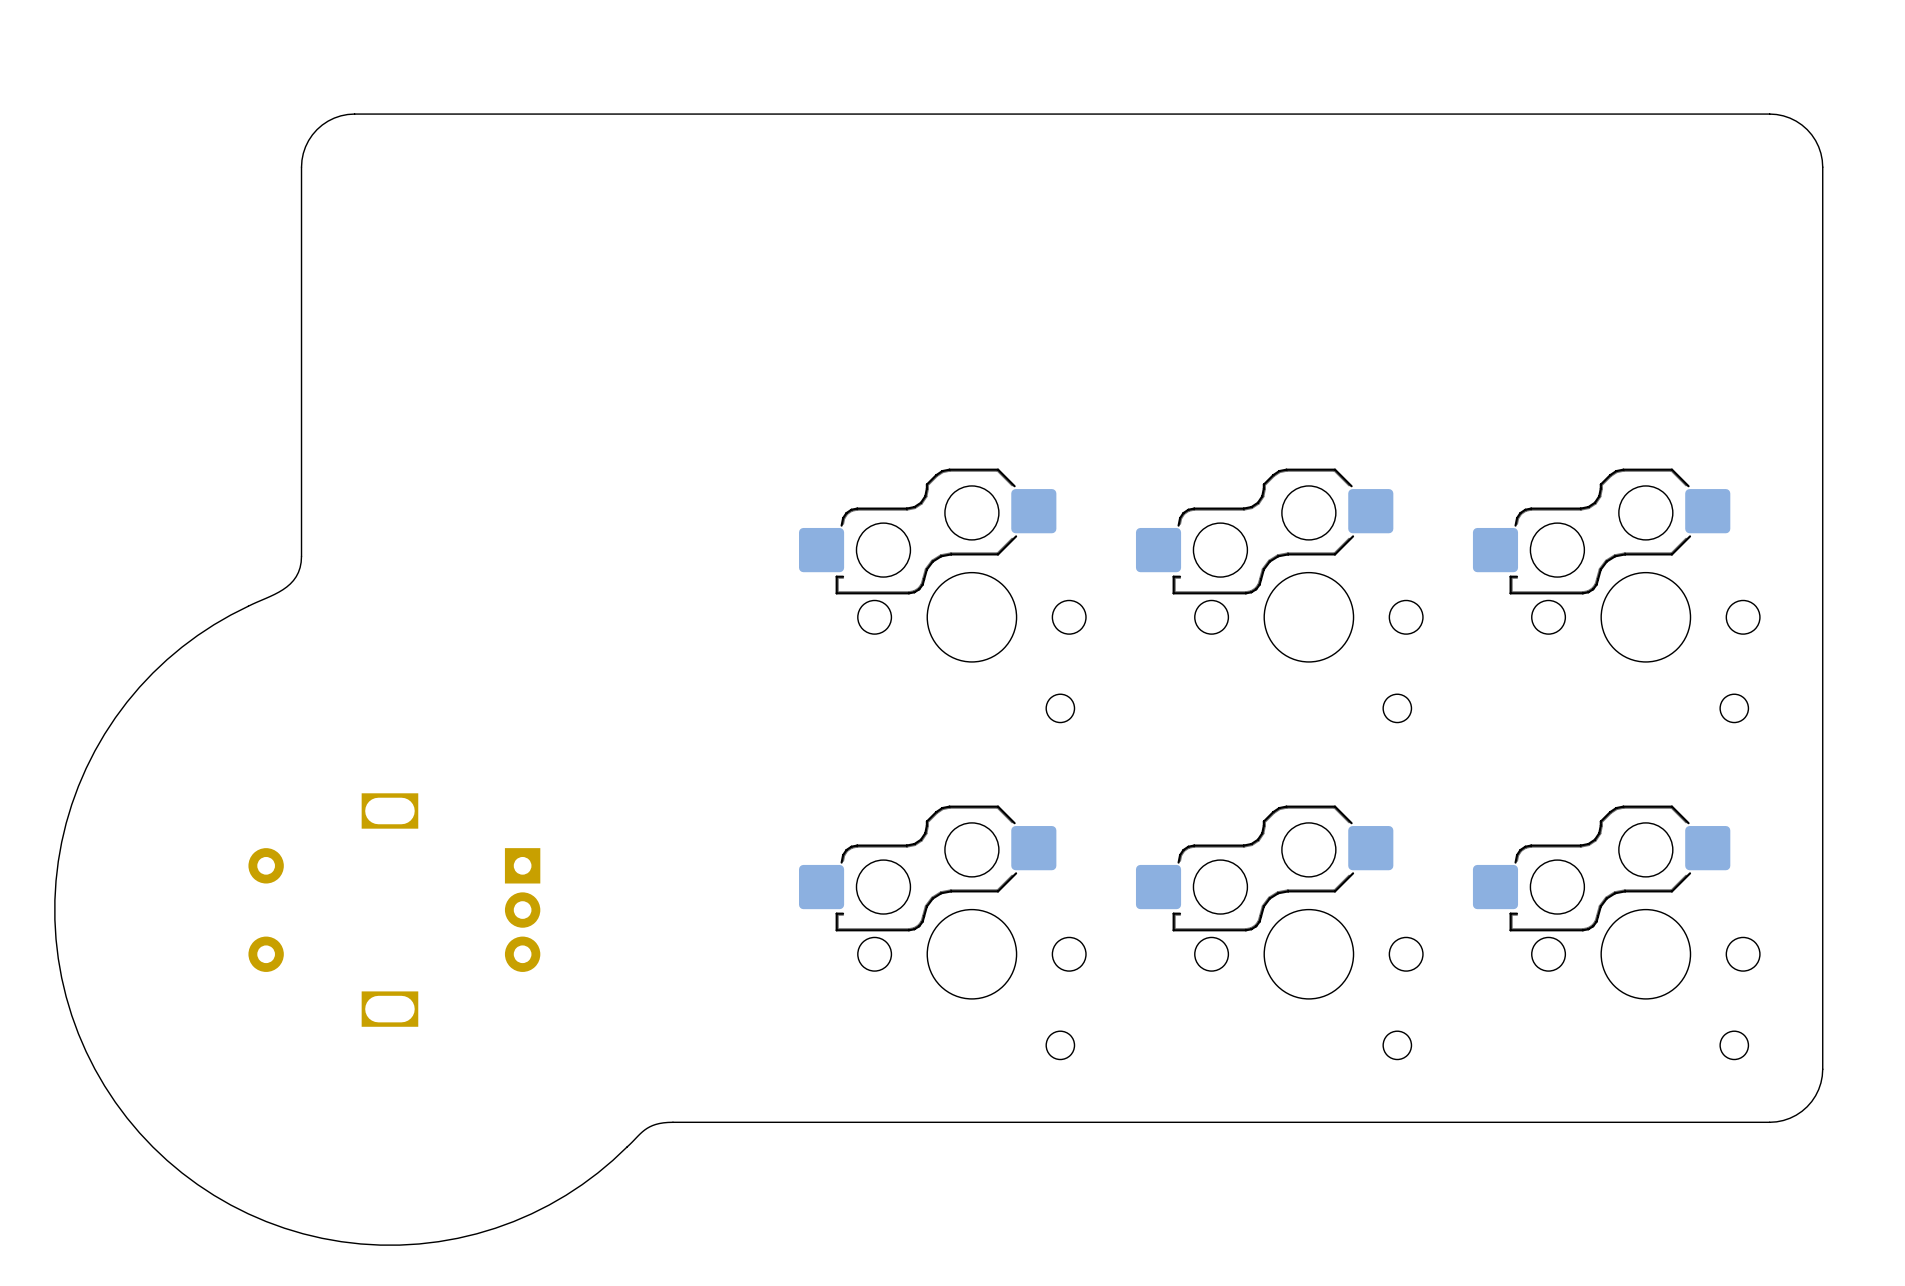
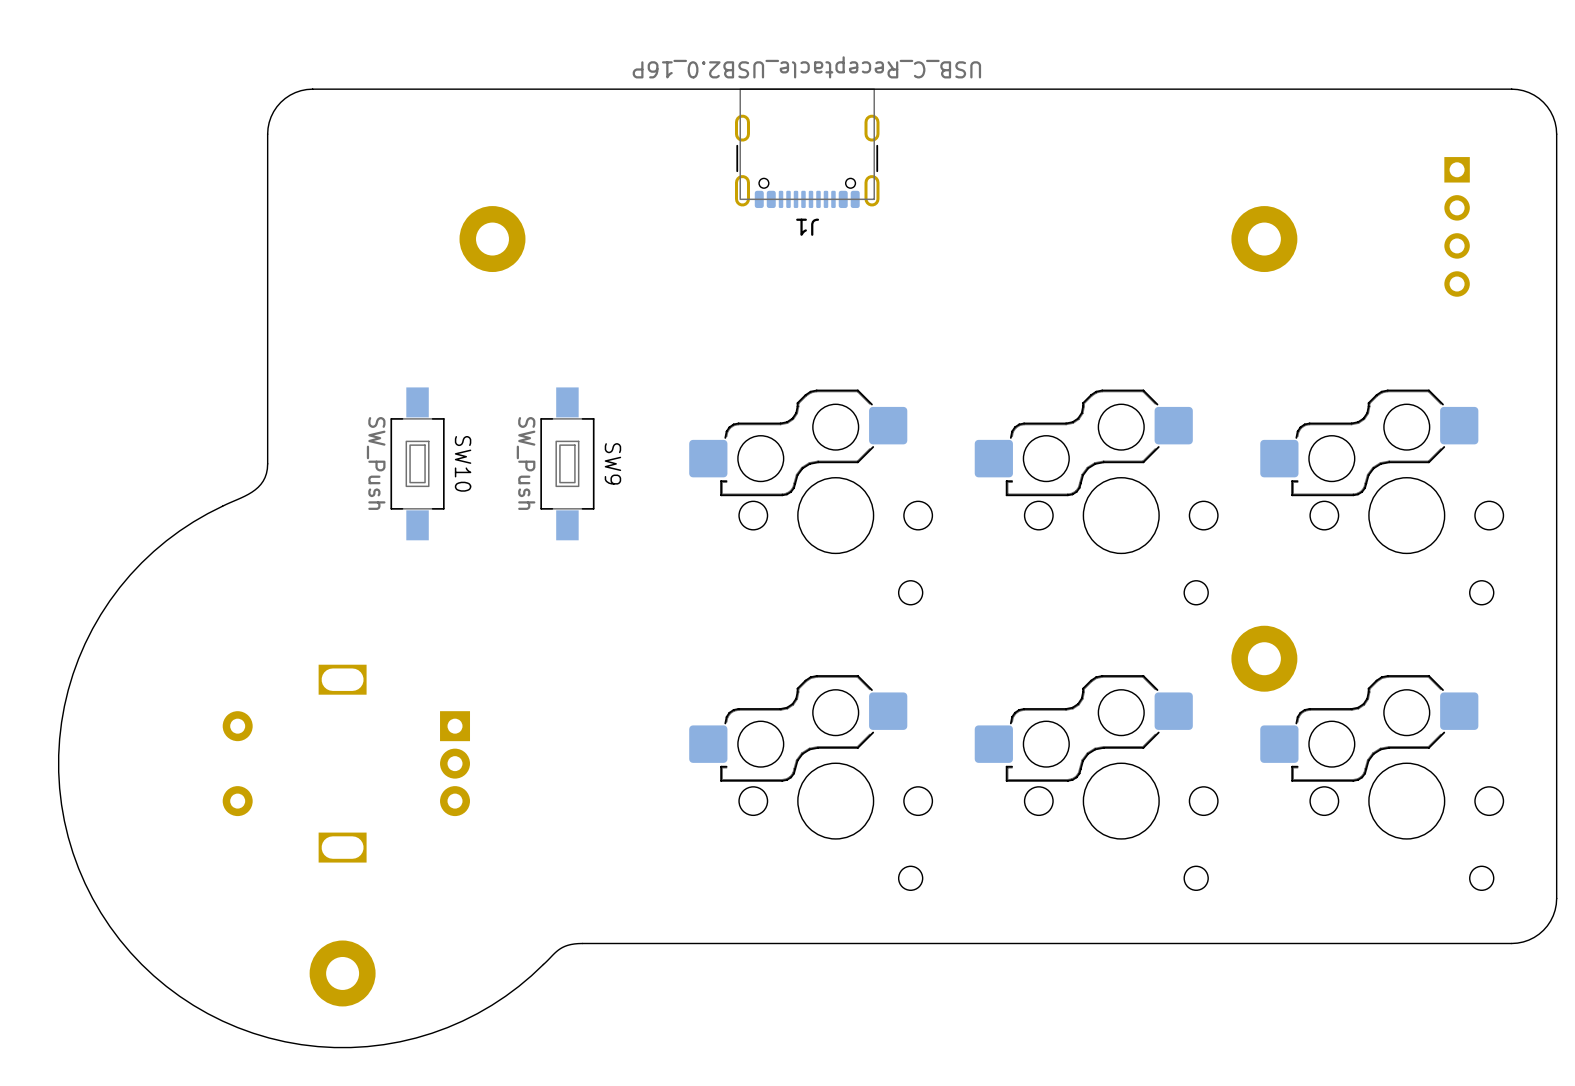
J1: none -> USB_C_Receptacle_USB2.0_16P (807, 148)
part: none -> (1457, 226)
part: none -> (492, 239)
part: none -> (1264, 239)
SW10: none -> SW_Push (417, 463)
SW9: none -> SW_Push (567, 463)
part: none -> (1264, 658)
part: none -> (342, 973)

